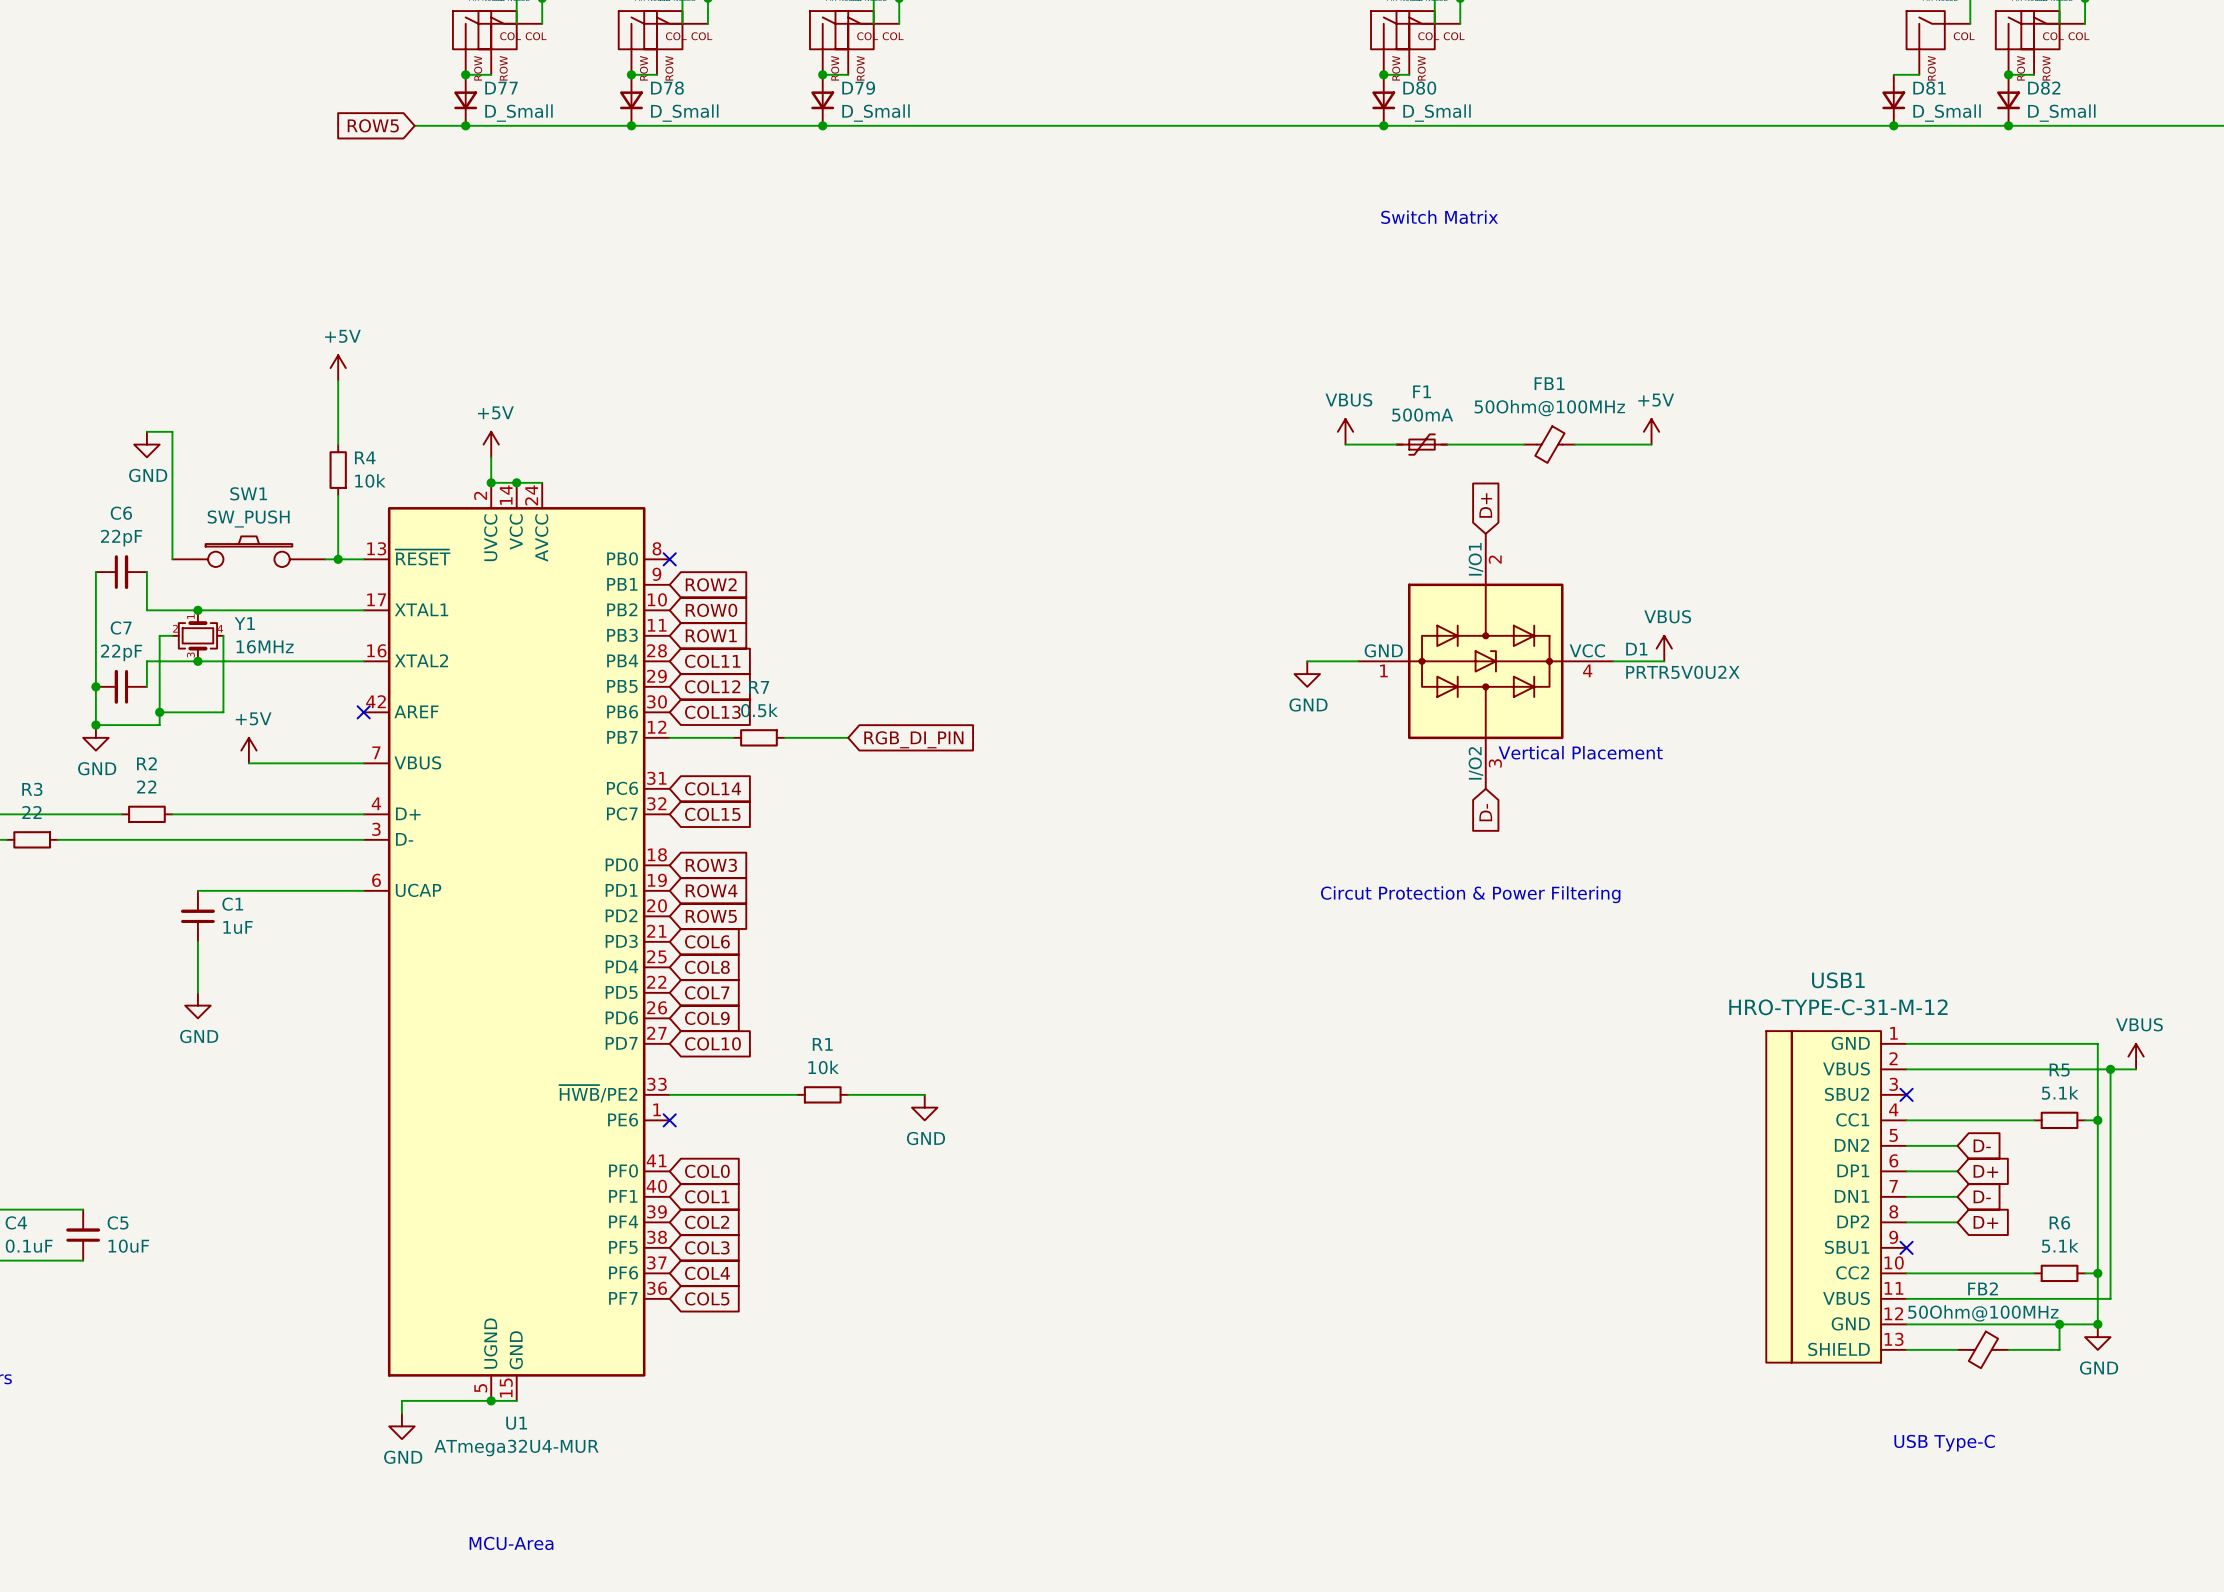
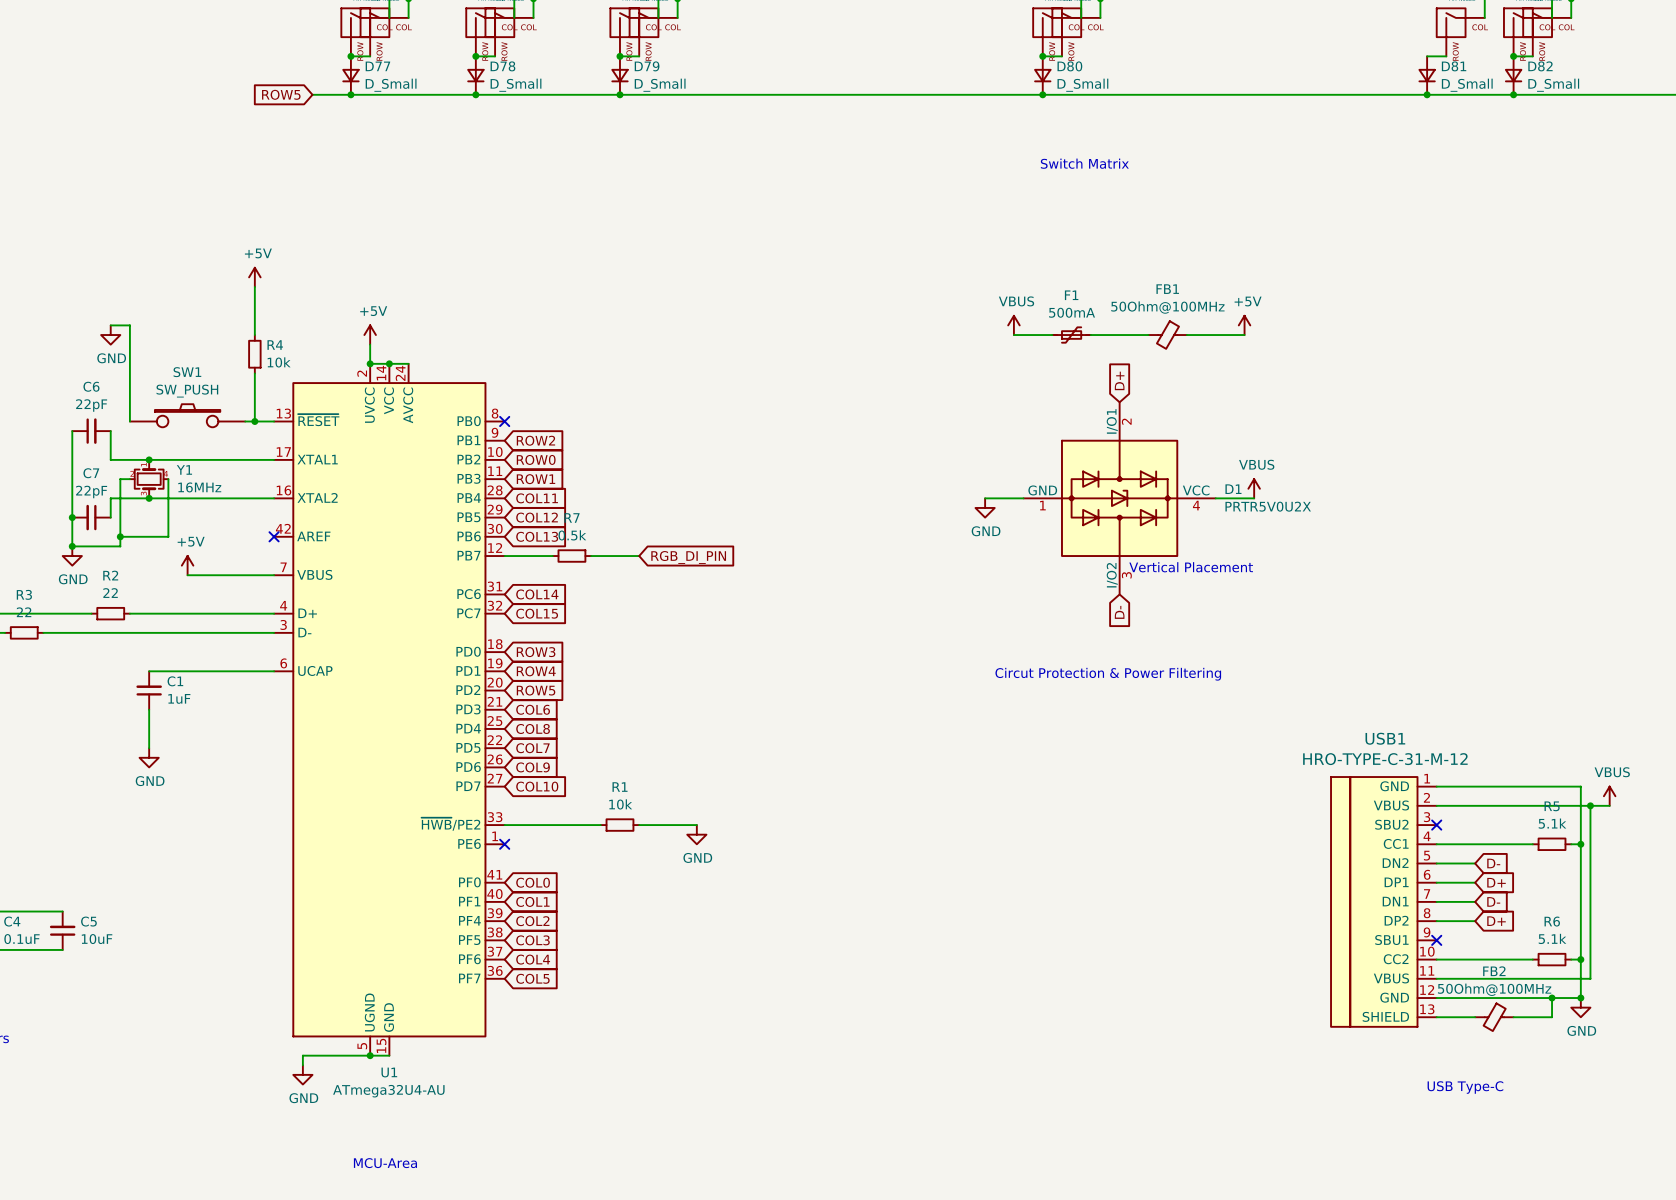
U1 value: ATmega32U4-MUR (516, 1448) -> ATmega32U4-AU (388, 1091)

